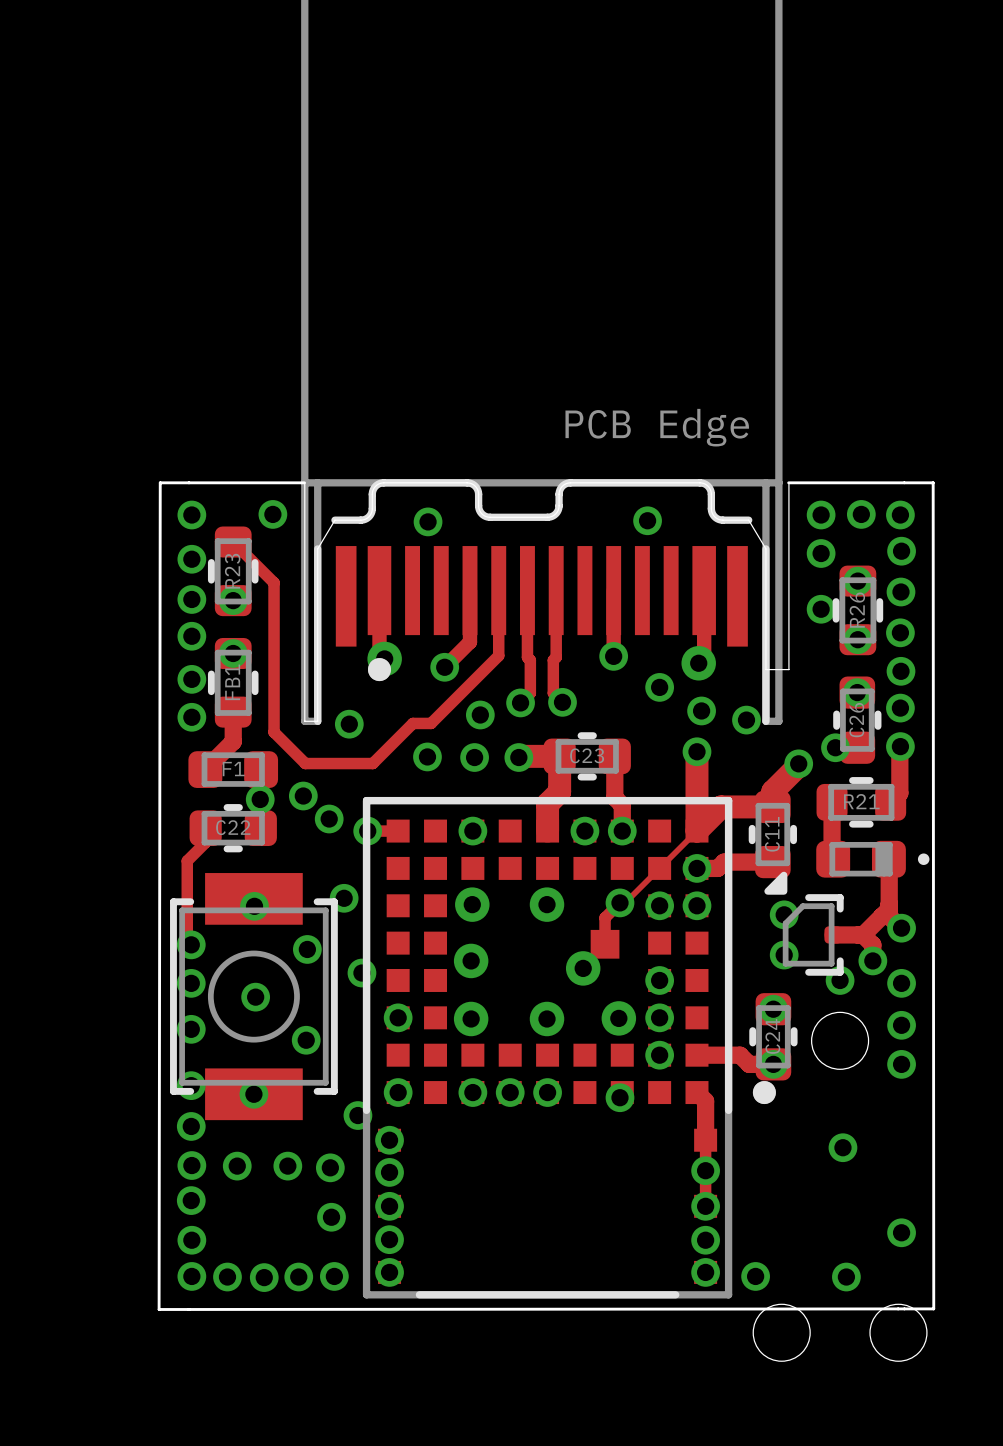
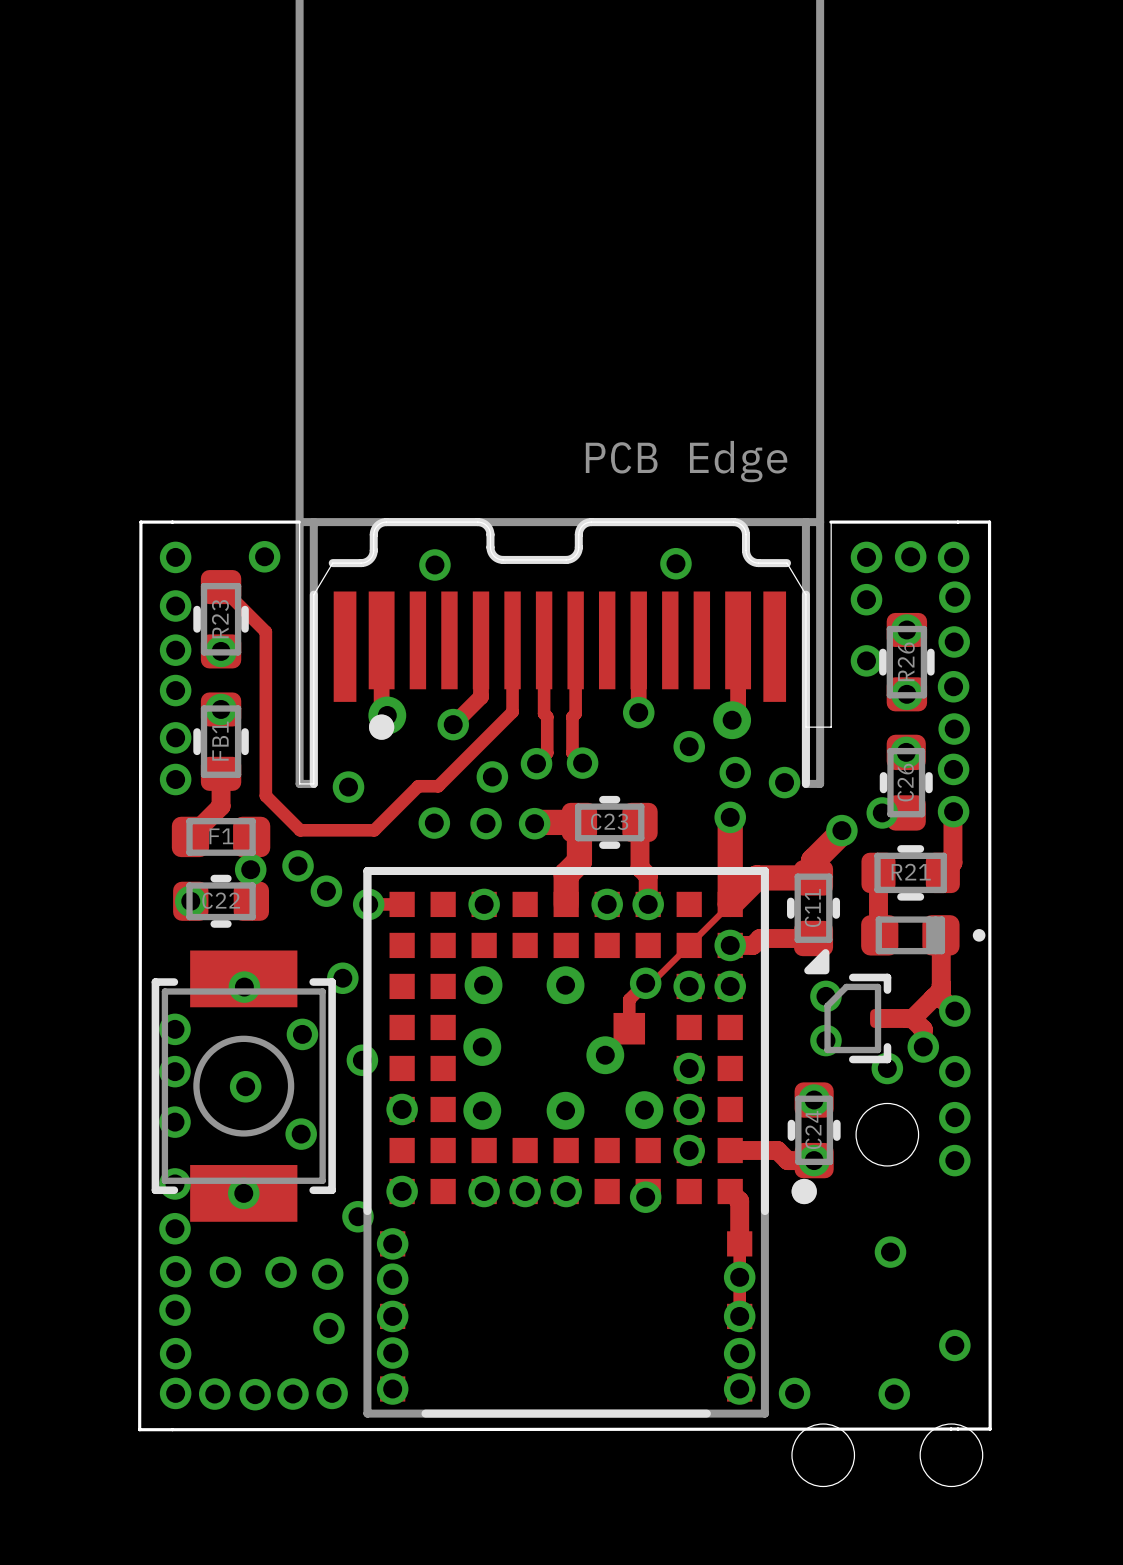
track: (205, 828) (205, 842) (187, 860) (187, 937) (191, 941) (191, 944) -> none
via: none -> (190, 901)

